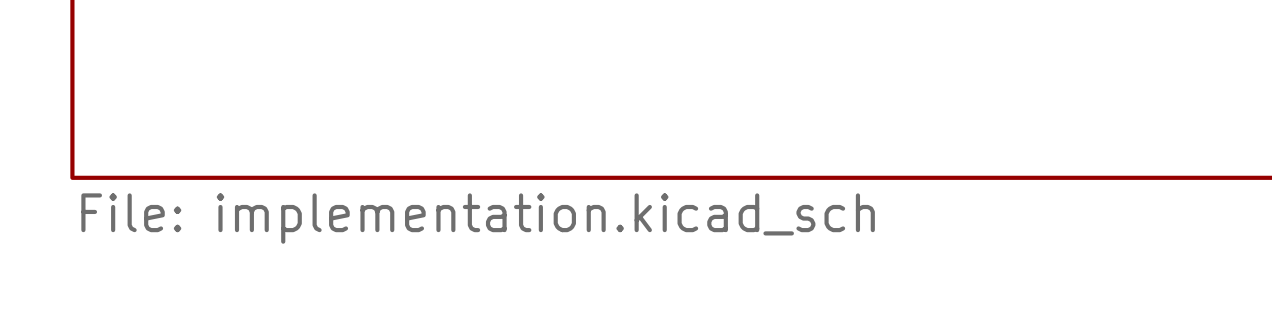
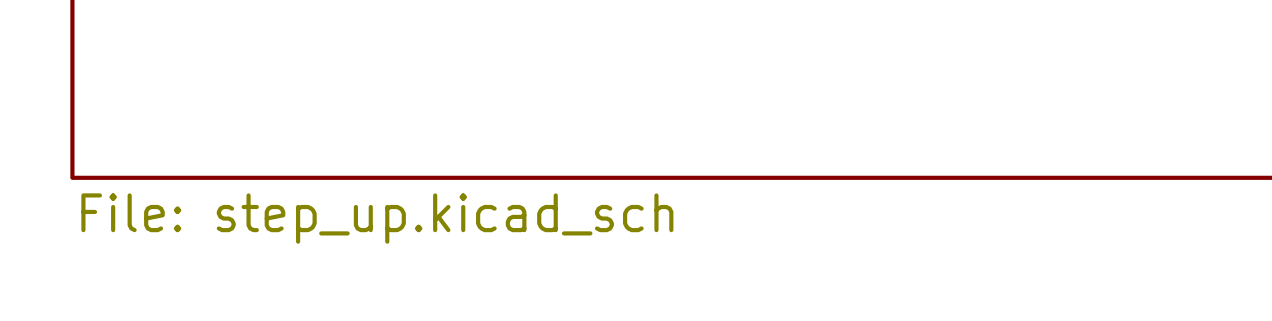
sheet value: File: implementation.kicad_sch (478, 218) -> File: step_up.kicad_sch (377, 218)

